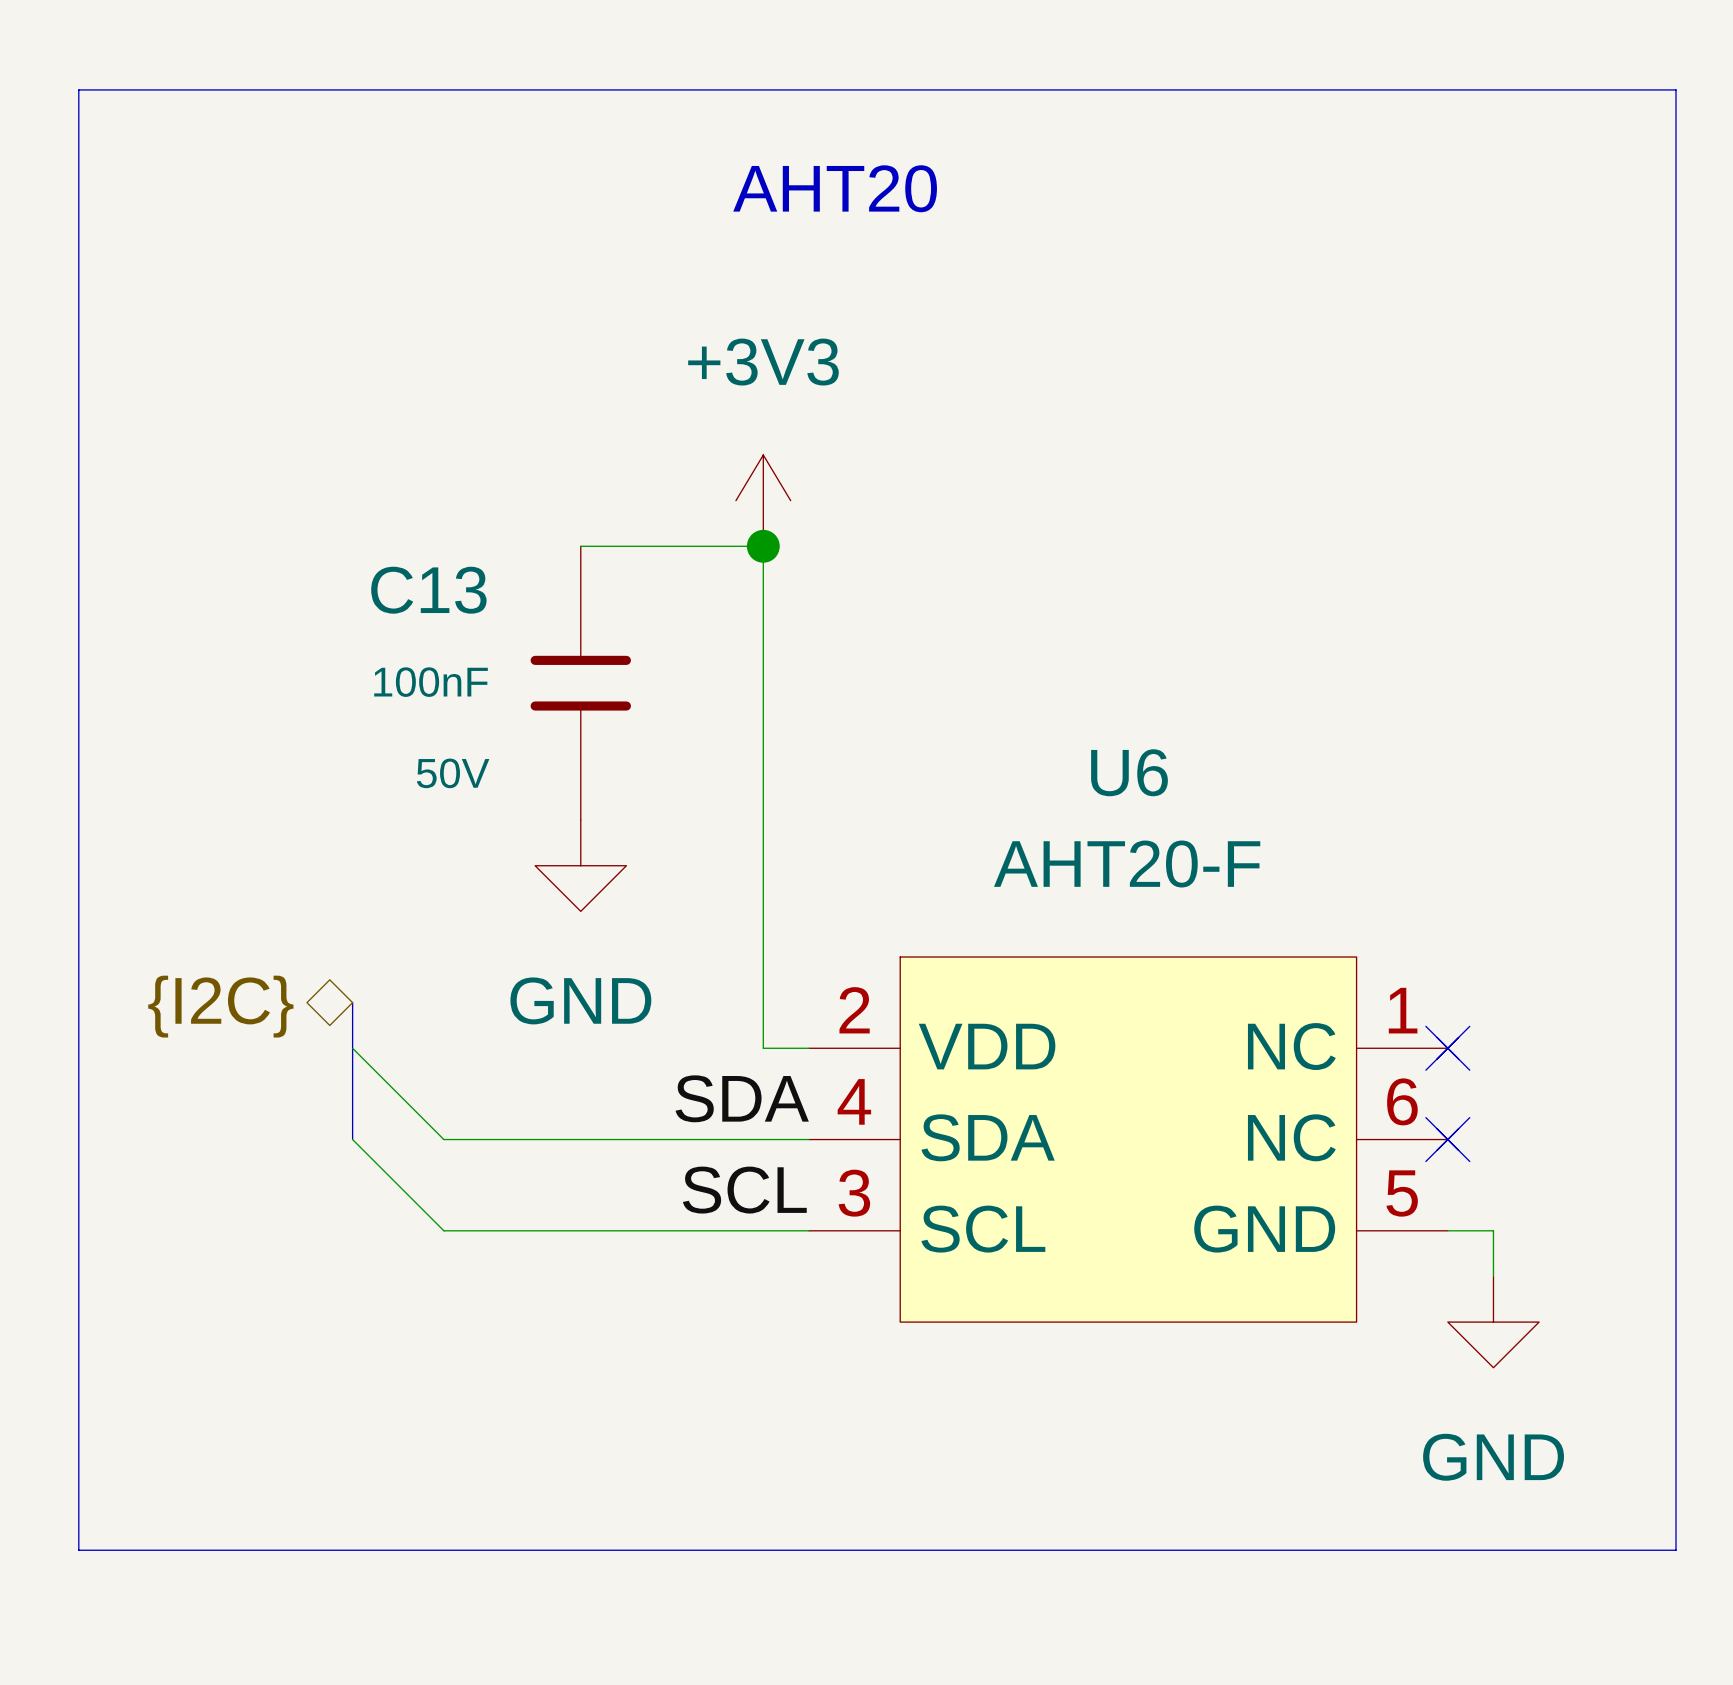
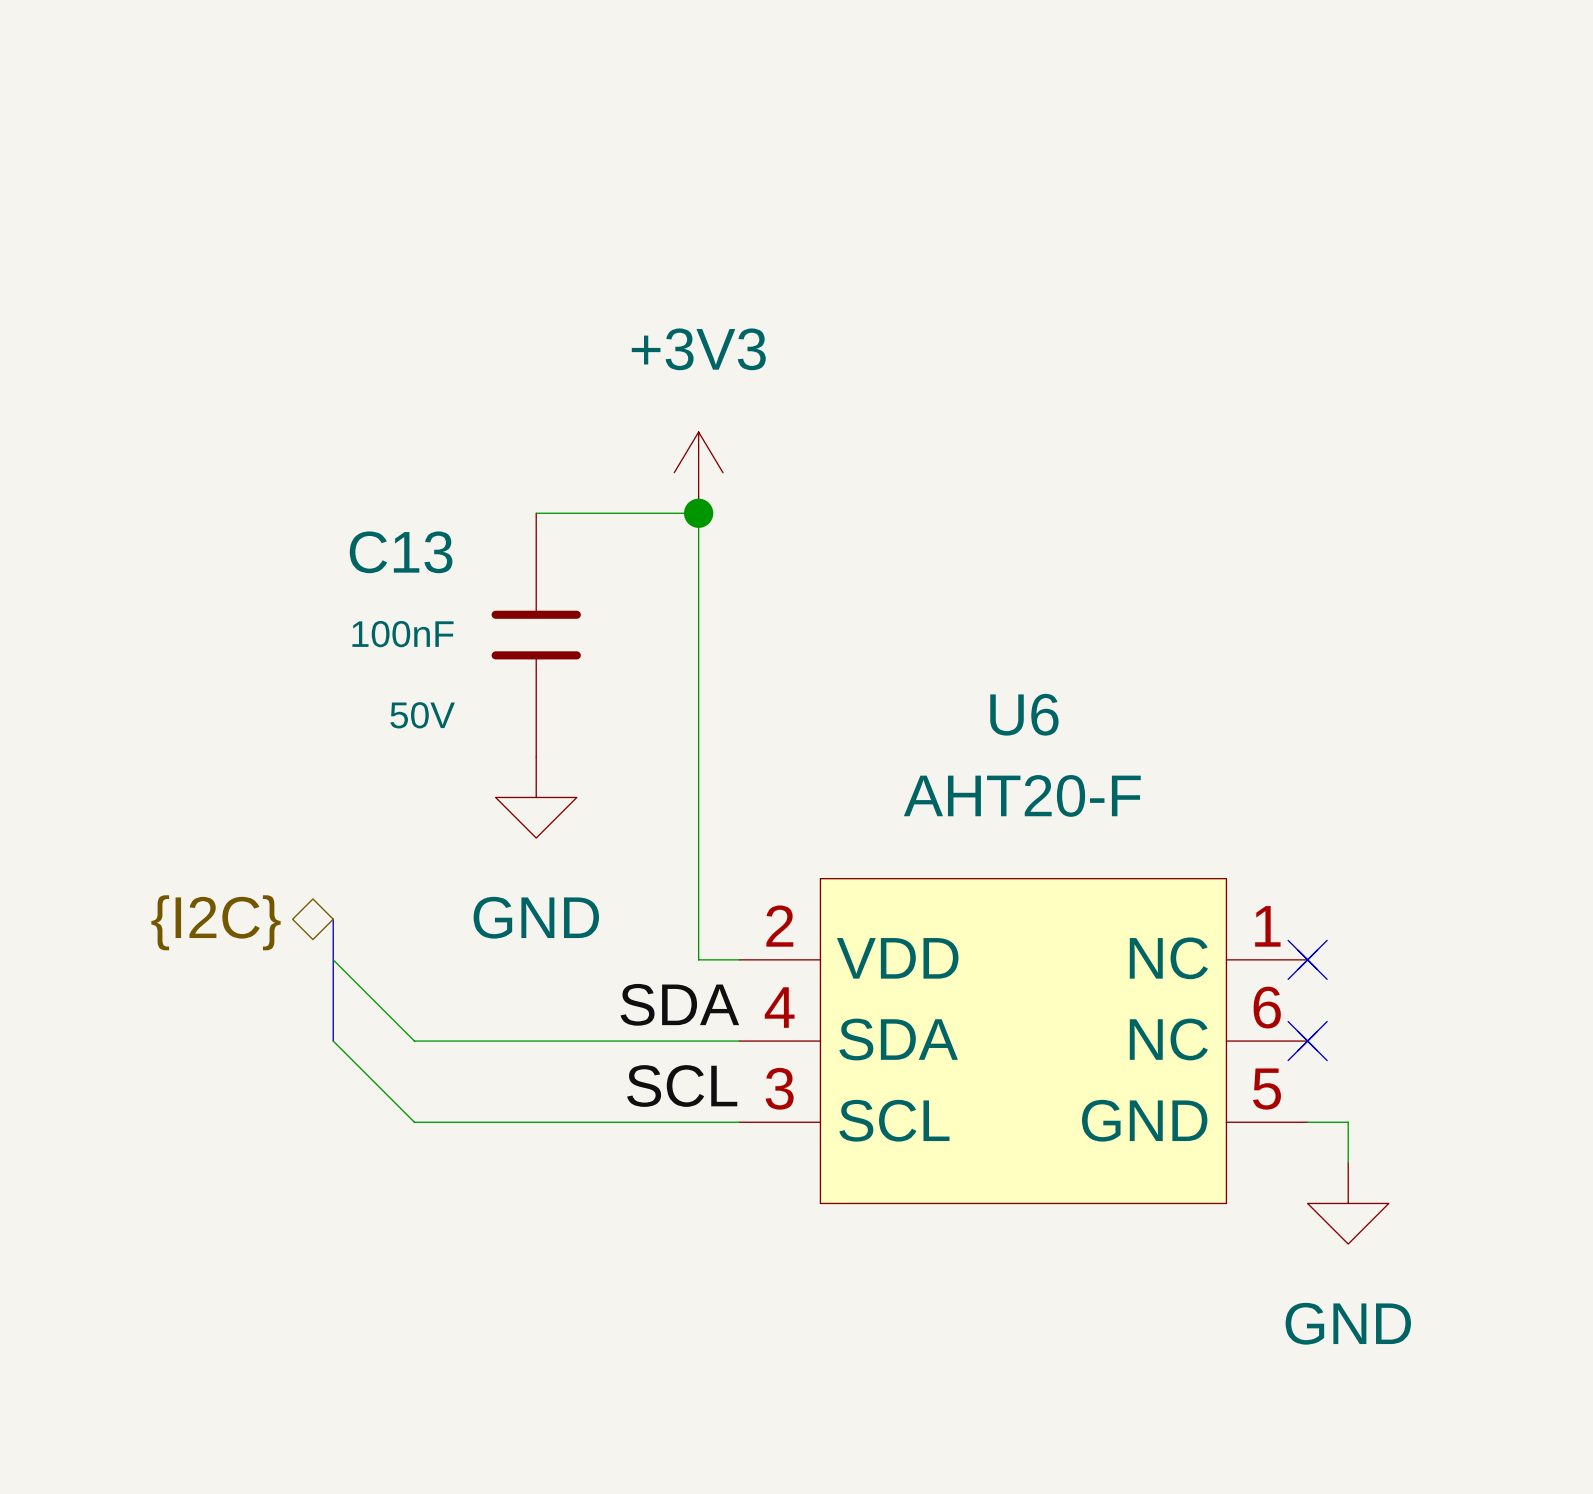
line: (78, 89) (1676, 89) (1676, 1550) (78, 1550) (78, 89) -> none
text: AHT20 (835, 188) -> none

